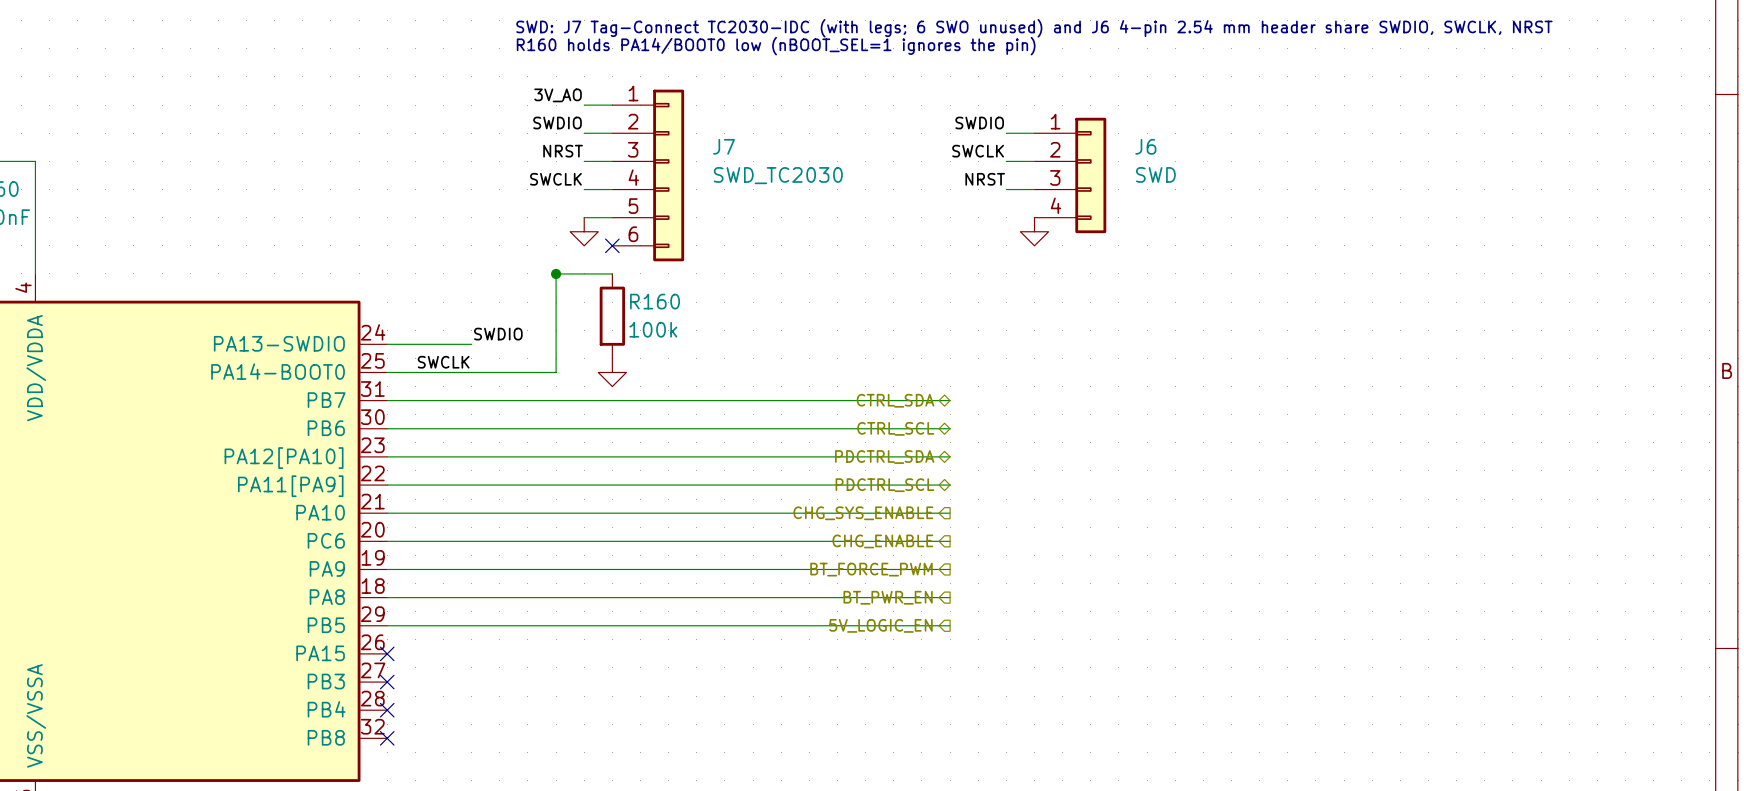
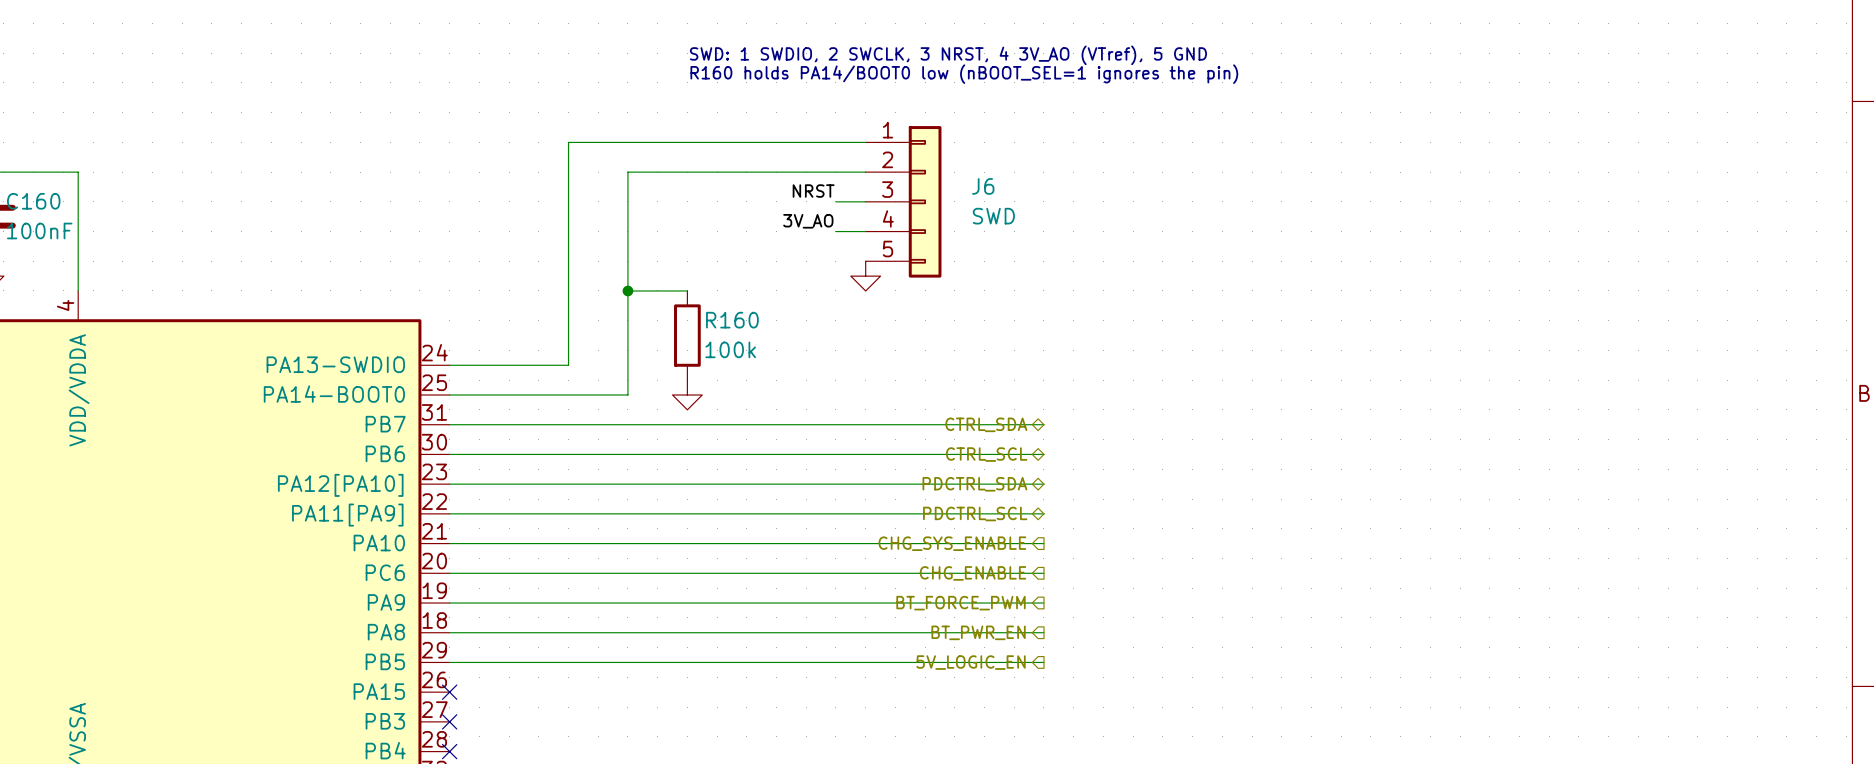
text: SWD: J7 Tag-Connect TC2030-IDC (with legs; 6 SWO unused) and J6 4-pin 2.54 mm header share SWDIO, SWCLK, NRST (1034, 28) -> none
text position: R160 holds PA14/BOOT0 low (nBOOT_SEL=1 ignores the pin) (776, 46) -> R160 holds PA14/BOOT0 low (nBOOT_SEL=1 ignores the pin) (964, 74)
text: none -> SWD: 1 SWDIO, 2 SWCLK, 3 NRST, 4 3V_AO (VTref), 5 GND (948, 55)
label position: 3V_AO (558, 95) -> 3V_AO (808, 221)
wire: (584, 105) (612, 105) -> none
J6 symbol: [1034, 117, 1107, 234] -> [865, 126, 942, 278]
label: SWDIO (557, 123) -> none
label: SWDIO (979, 123) -> none
wire: none -> (657, 142) (568, 142) (568, 365) (538, 365)
wire: none -> (687, 142) (865, 142)
wire: (1006, 133) (1034, 133) -> none
label: NRST (563, 151) -> none
label: SWCLK (978, 151) -> none
wire: none -> (657, 172) (627, 172) (627, 290)
wire: none -> (687, 172) (865, 172)
wire: (1006, 161) (1034, 161) -> none
J7: SWD_TC2030 (648, 175) -> none
label: SWCLK (555, 179) -> none
label: none -> NRST (813, 191)
label: NRST (985, 179) -> none
wire: (584, 189) (612, 189) -> (835, 201) (865, 201)
wire: (1006, 189) (1034, 189) -> none
wire: (584, 217) (612, 217) -> (835, 231) (865, 231)
power symbol: (584, 231) -> none
power symbol: (1034, 231) -> none
no-connect mark: (612, 245) -> none
power symbol: none -> (865, 276)
label: SWDIO (498, 334) -> none
label: SWCLK (443, 362) -> none

